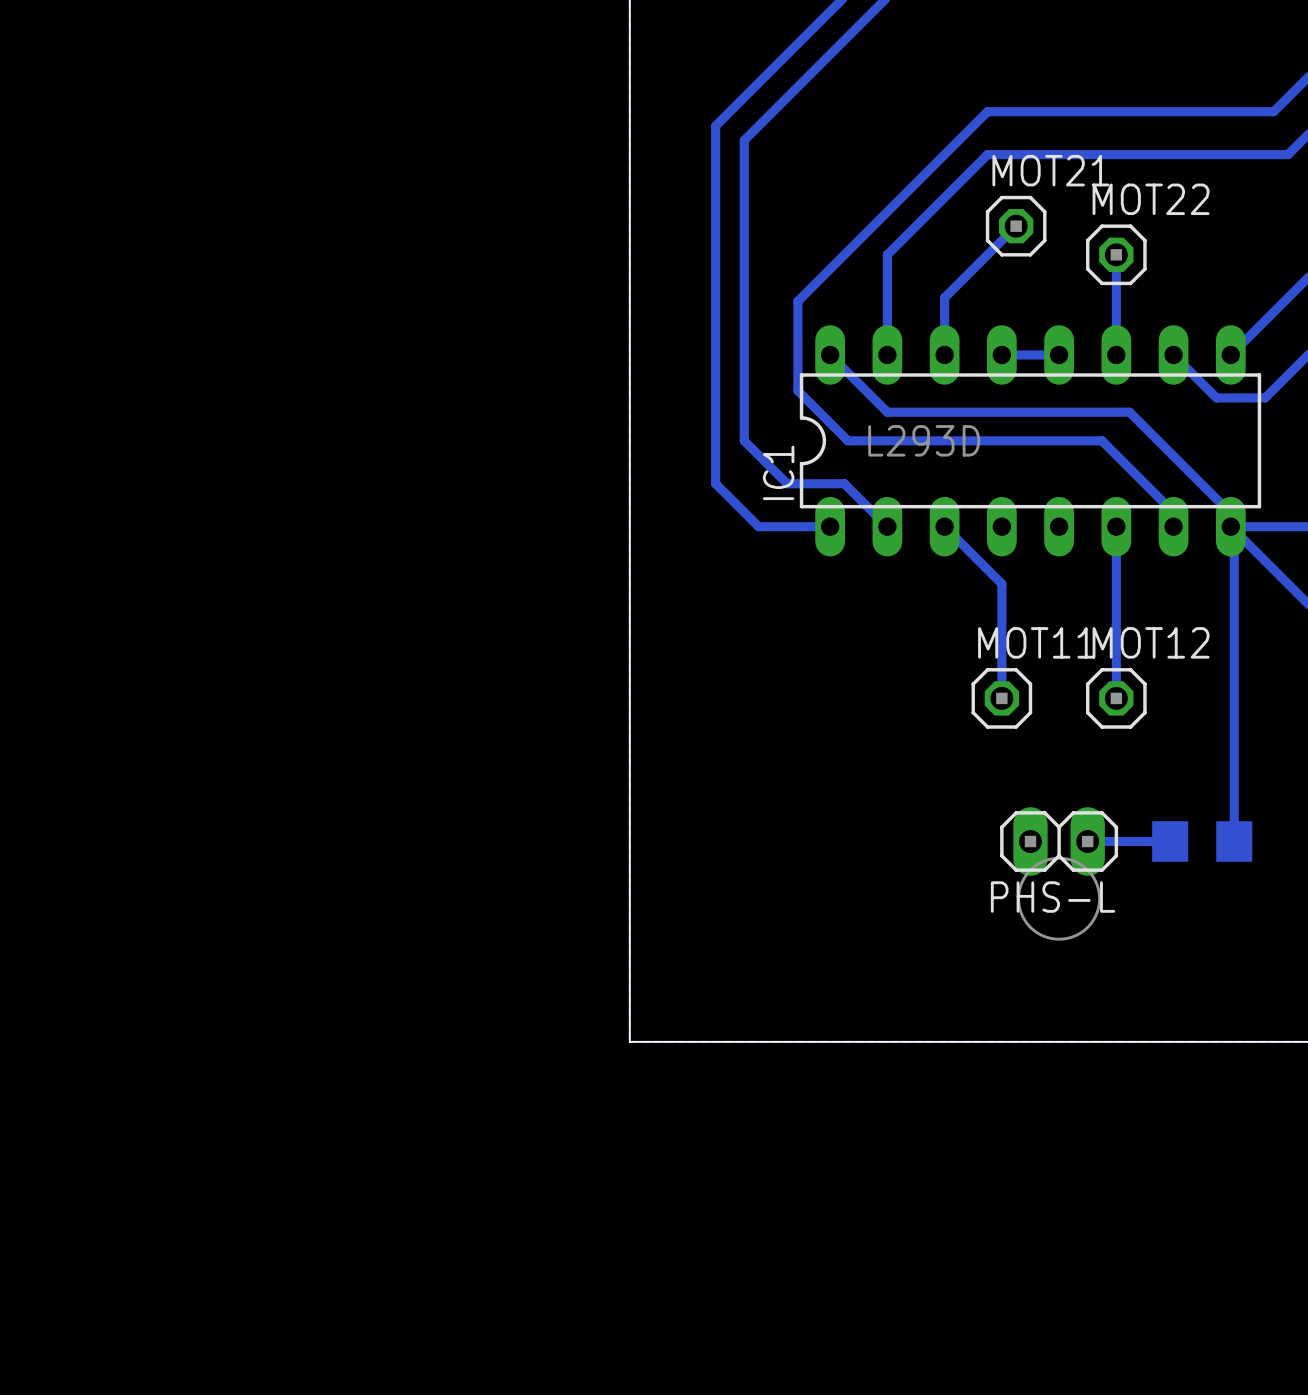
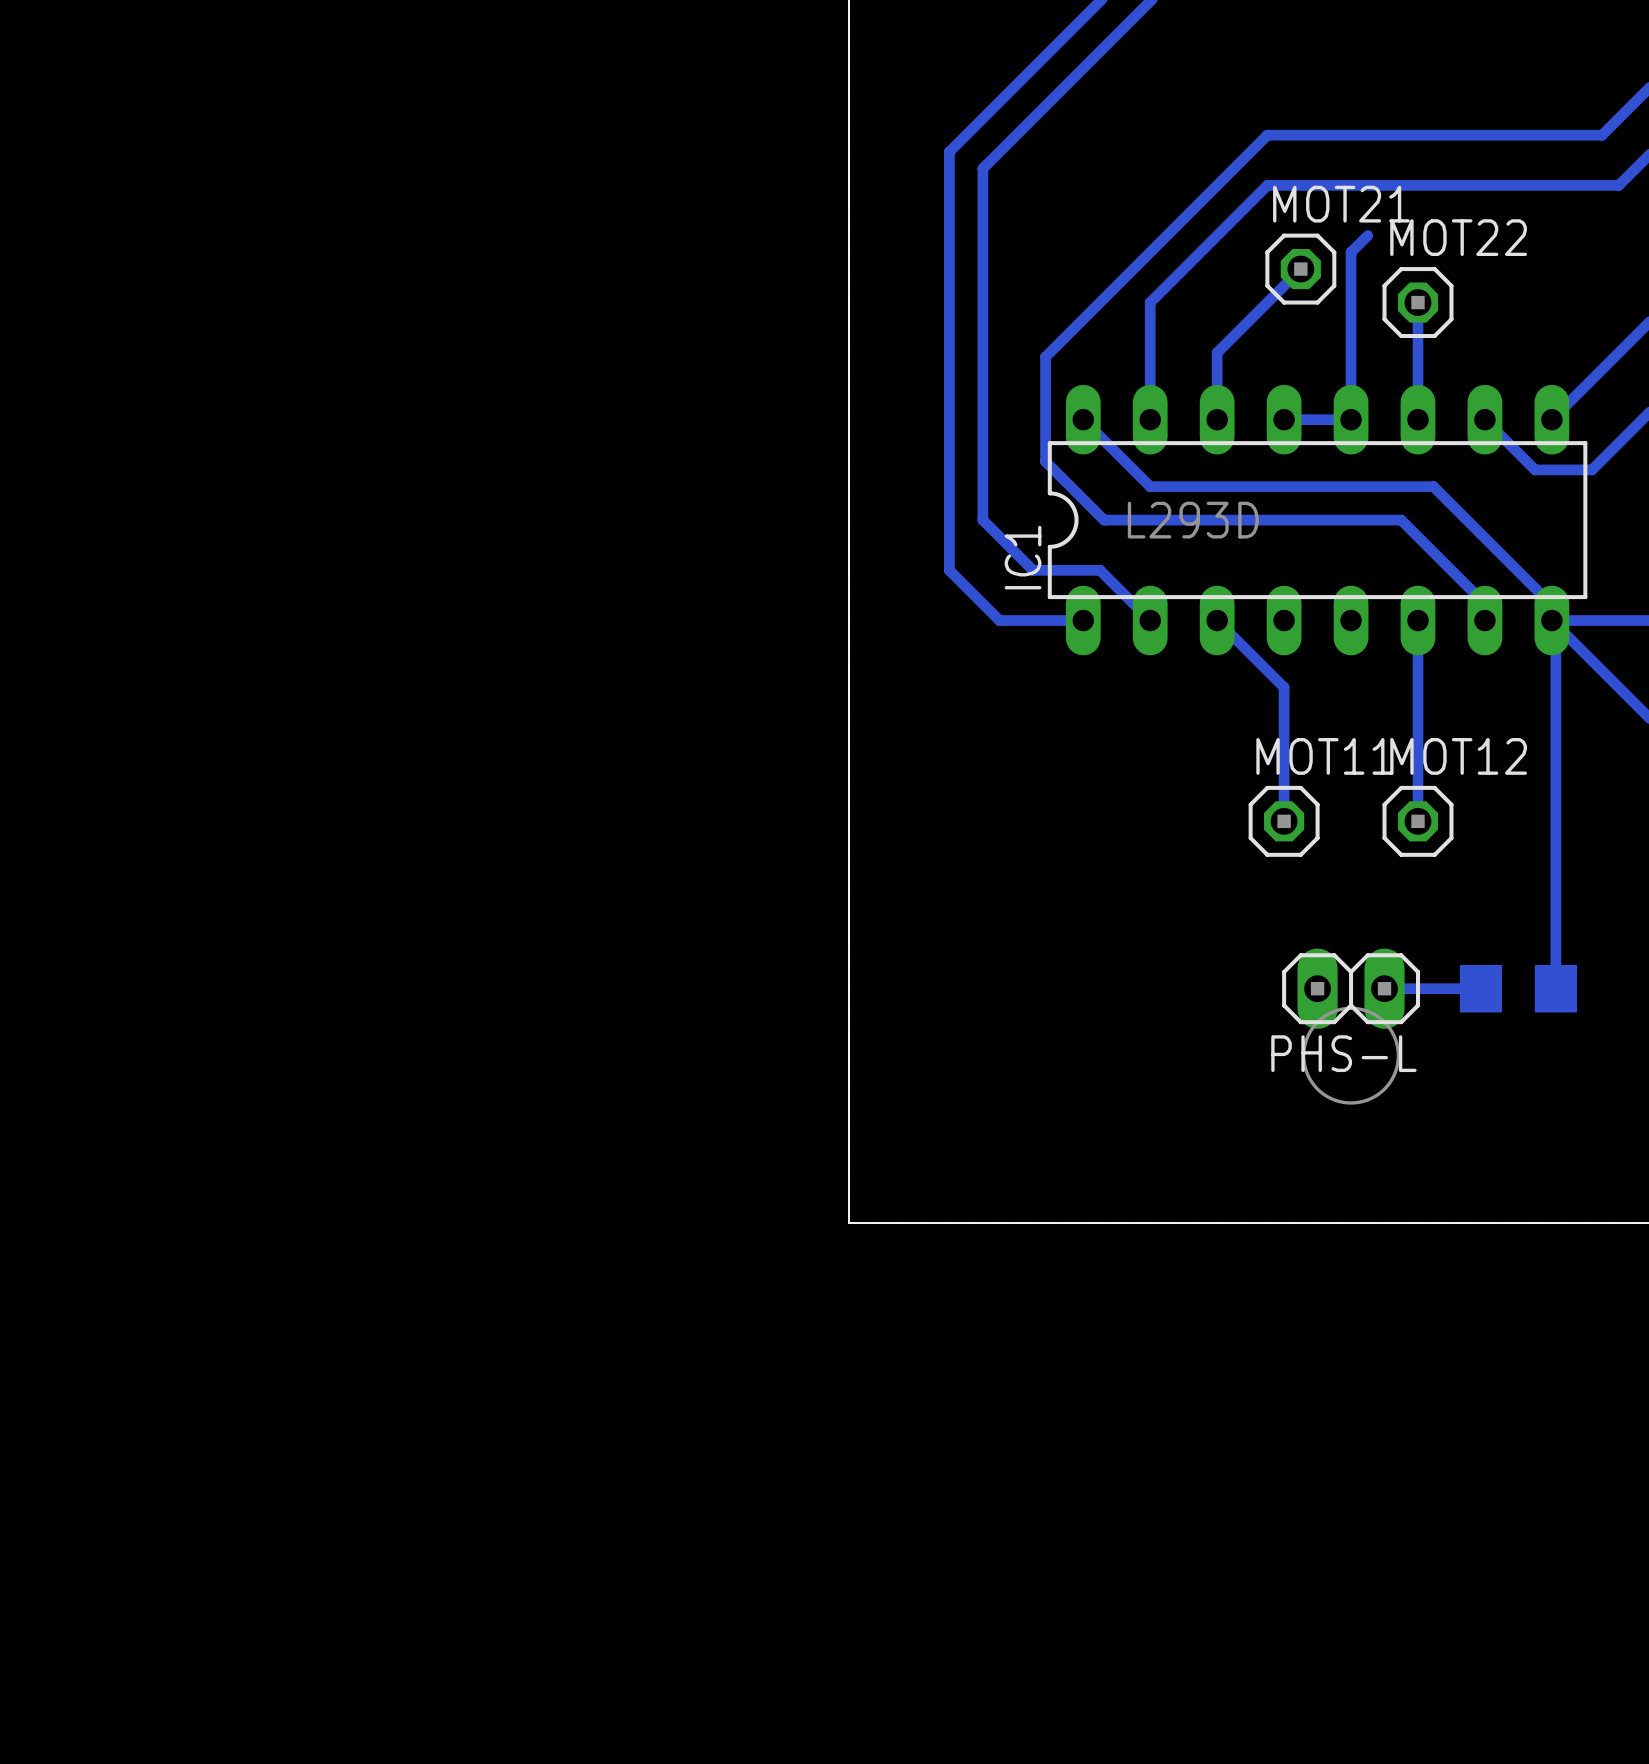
bottom track: none -> (1367, 235) (1351, 252) (1351, 419)

